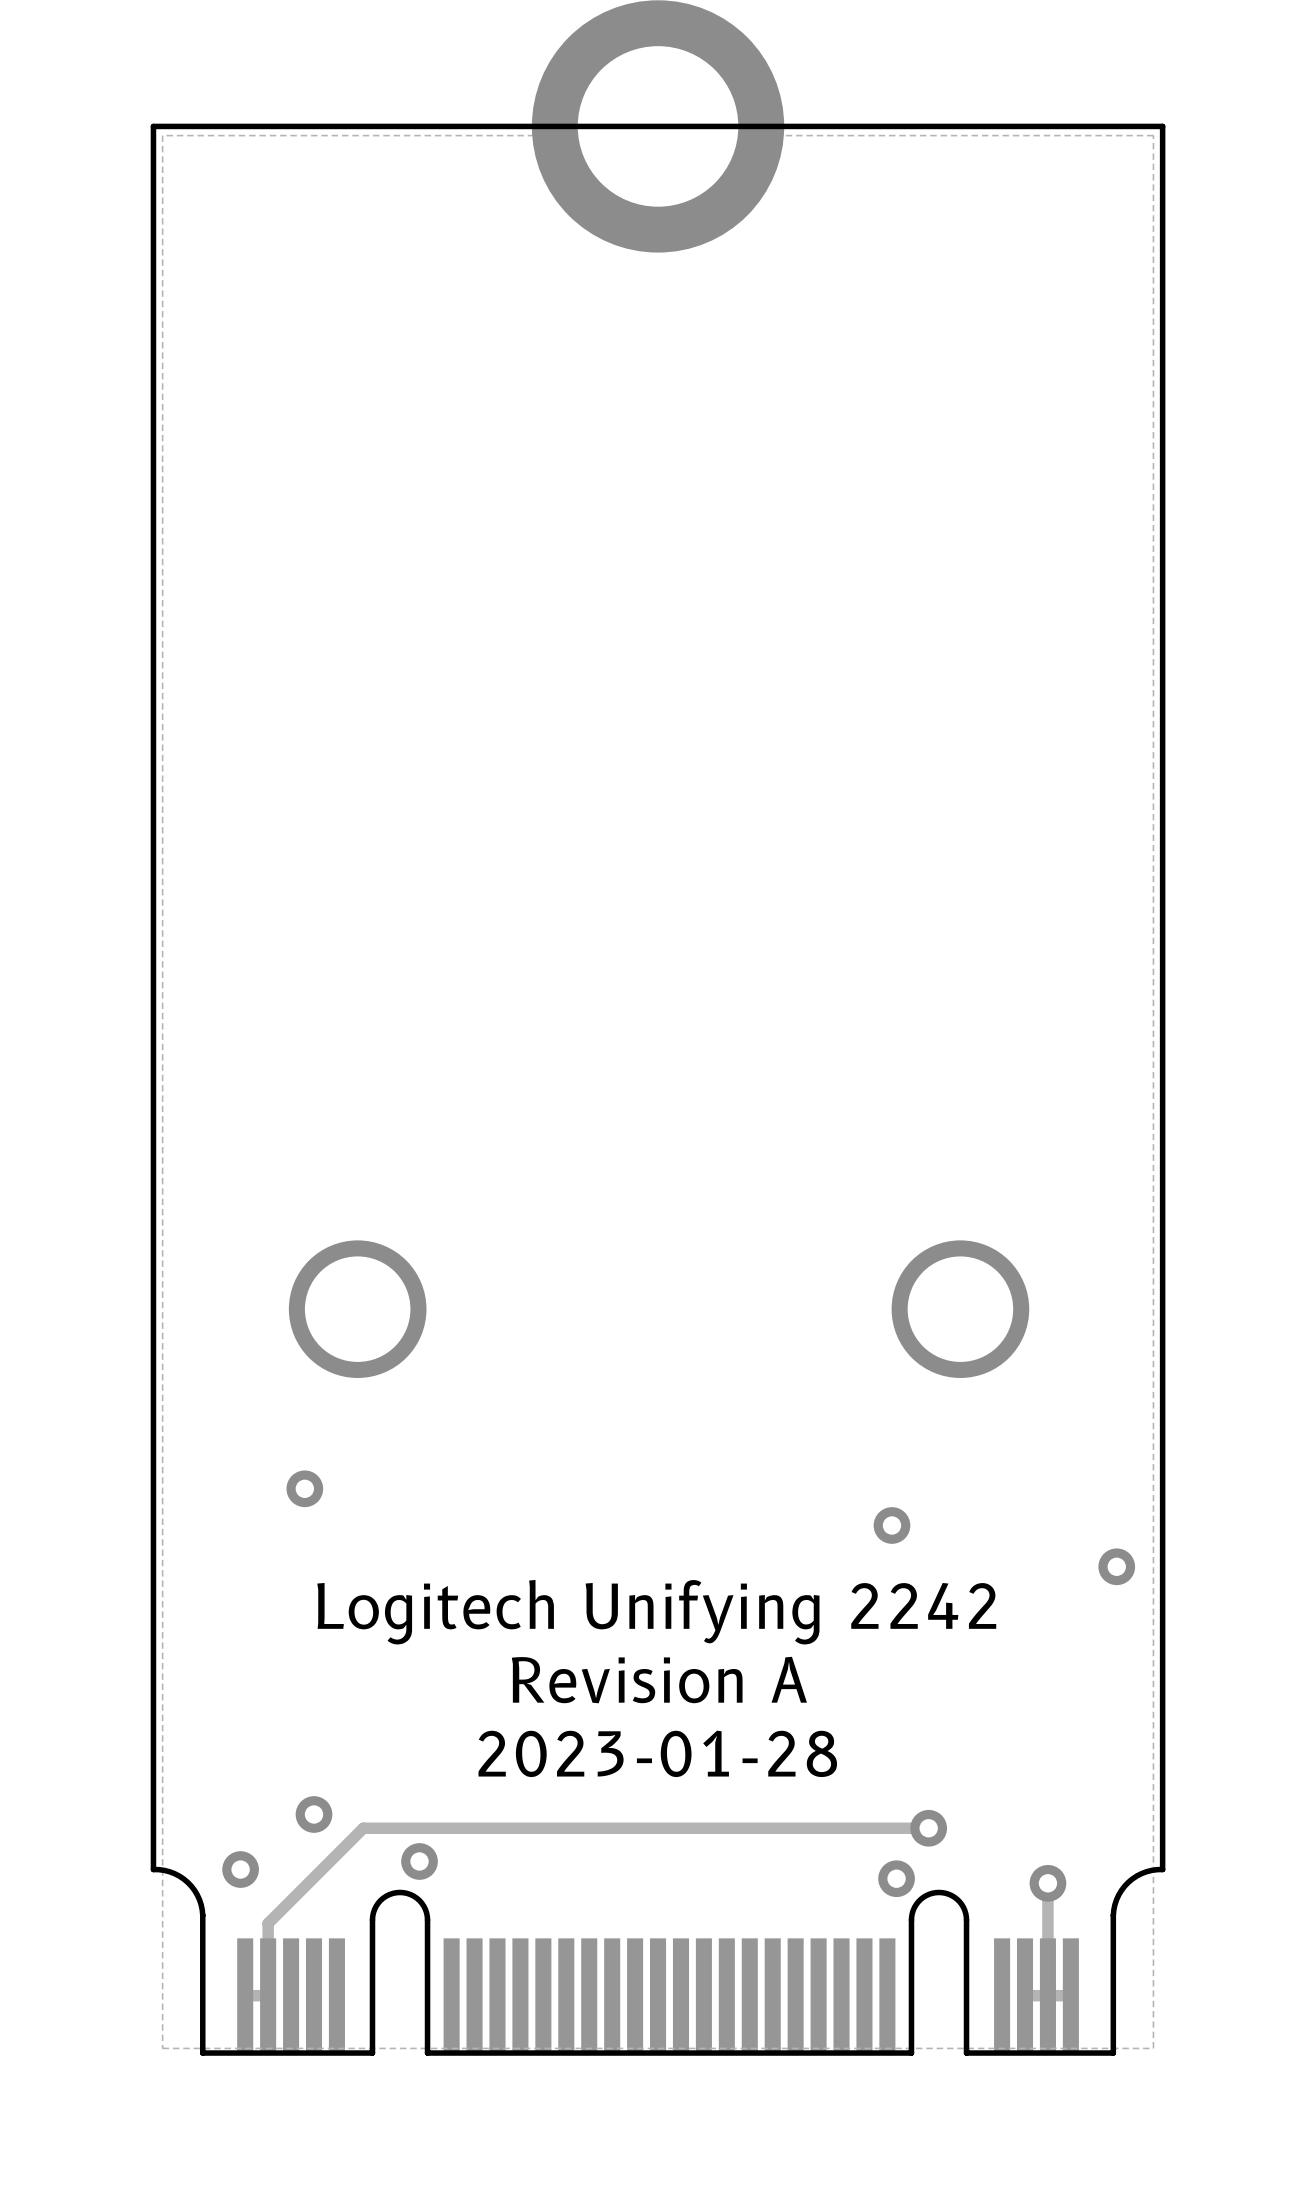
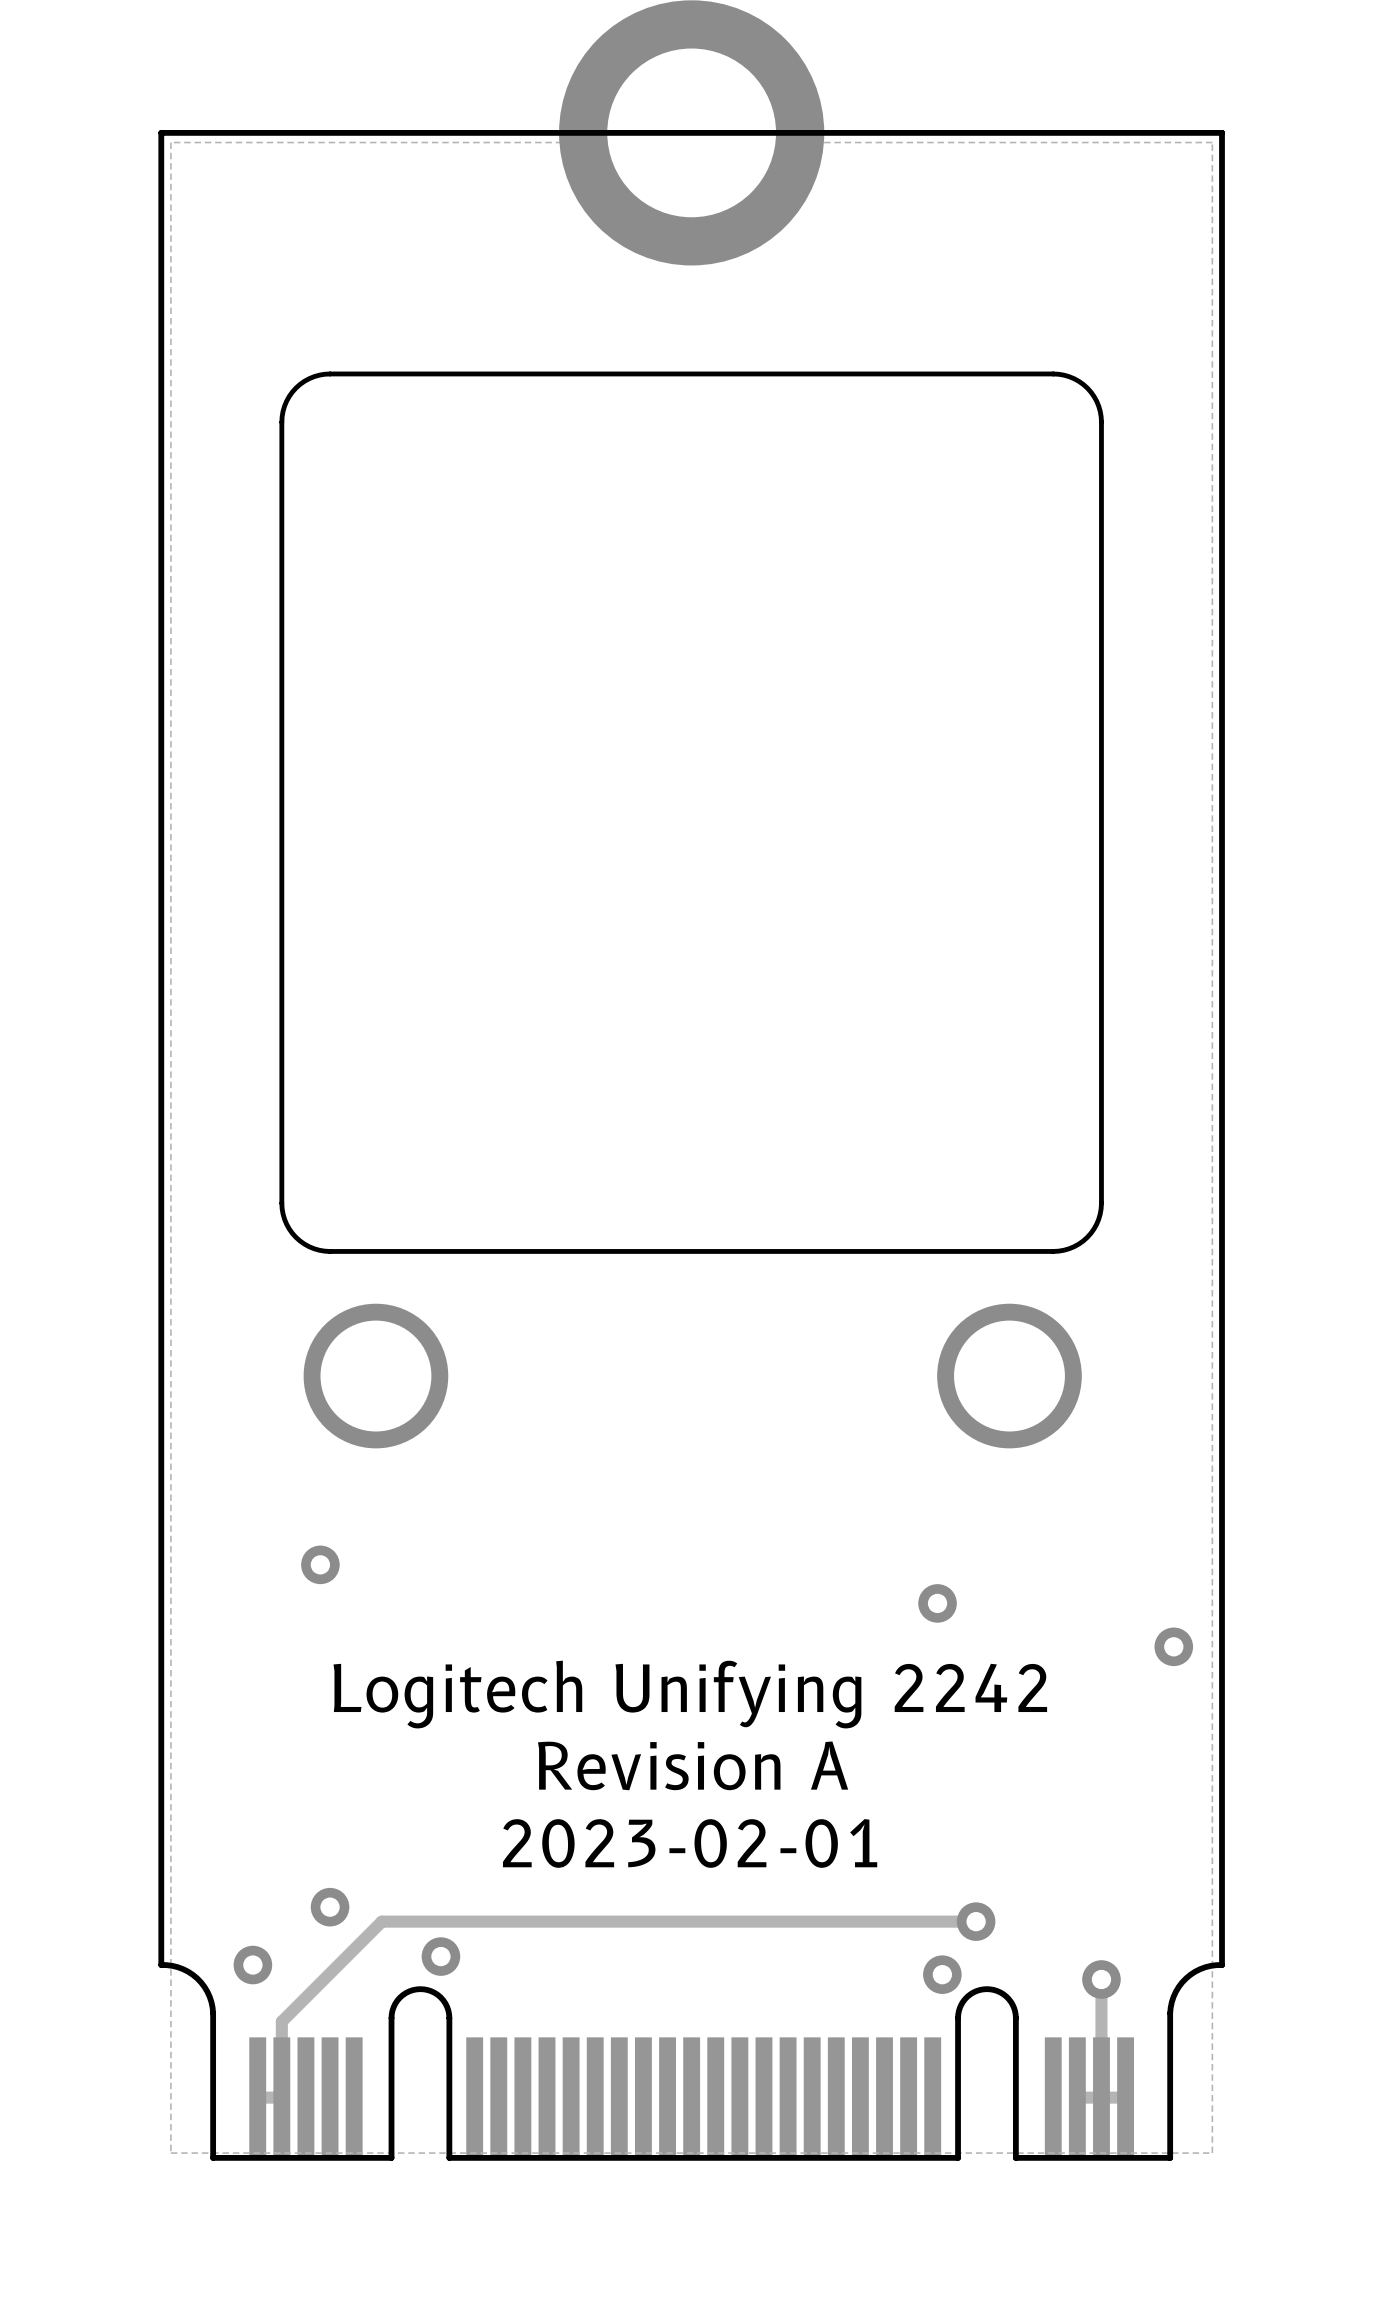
board edge: none -> (1053, 373) (330, 373) (309, 378) (292, 392) (284, 406) (281, 422) (281, 1203) (286, 1224) (299, 1240) (314, 1248) (330, 1251) (1053, 1251) (1074, 1246) (1090, 1233) (1098, 1219) (1101, 1203) (1101, 422) (1096, 401) (1087, 388) (1074, 378) (1053, 373)
text: 2023-01-28 (657, 1753) -> 2023-02-01 (690, 1843)

